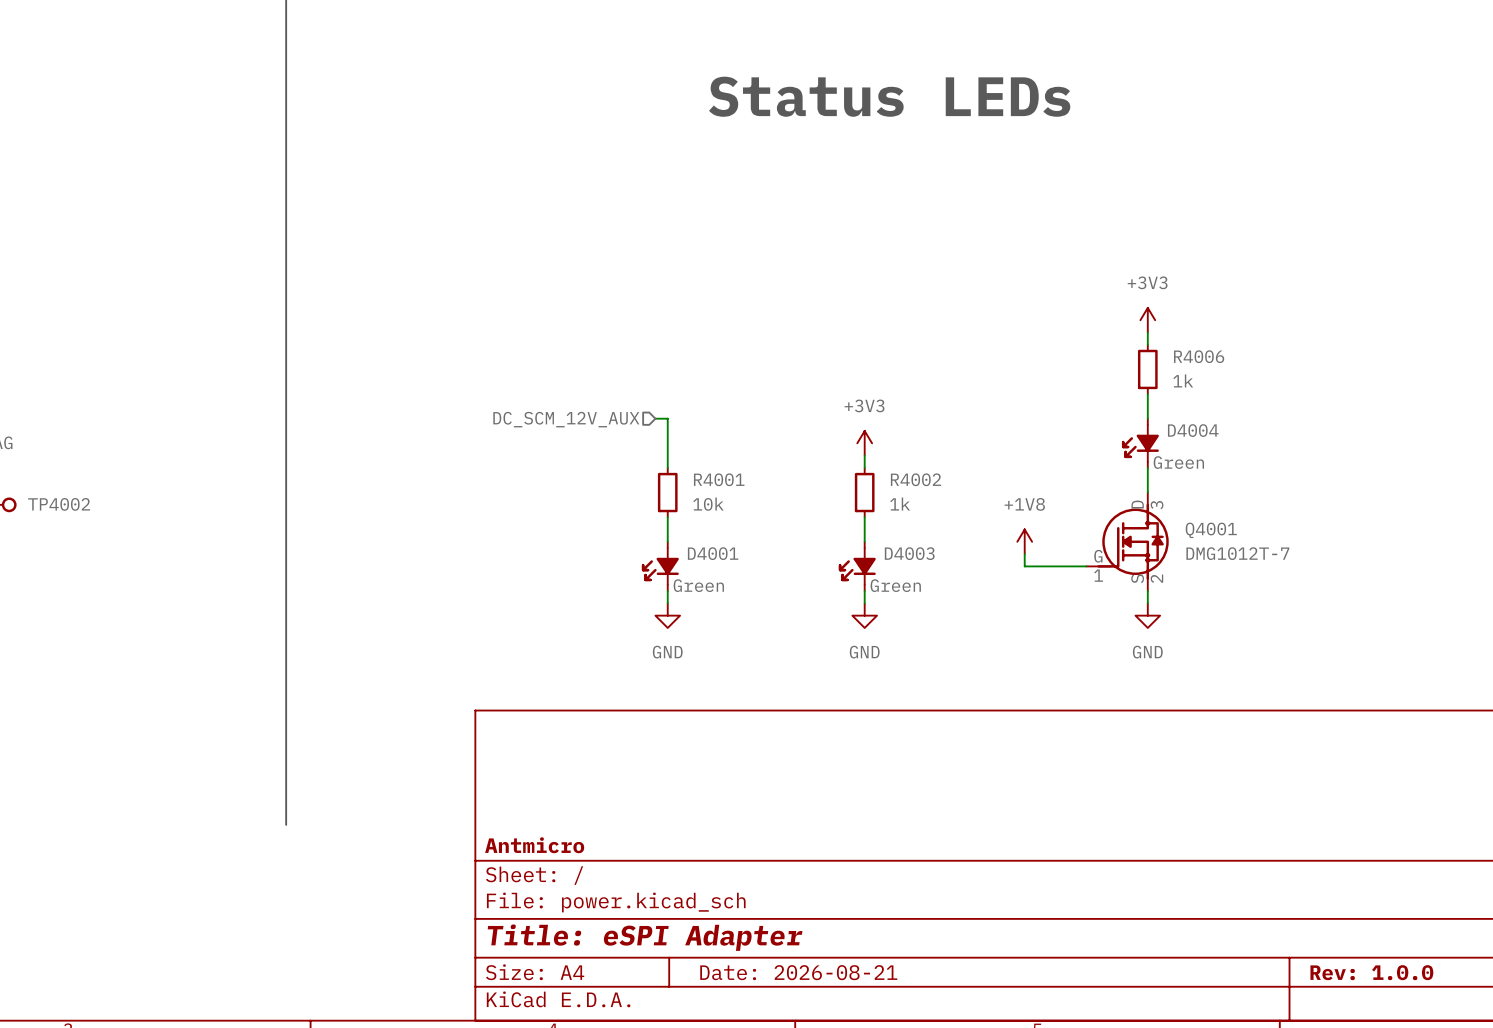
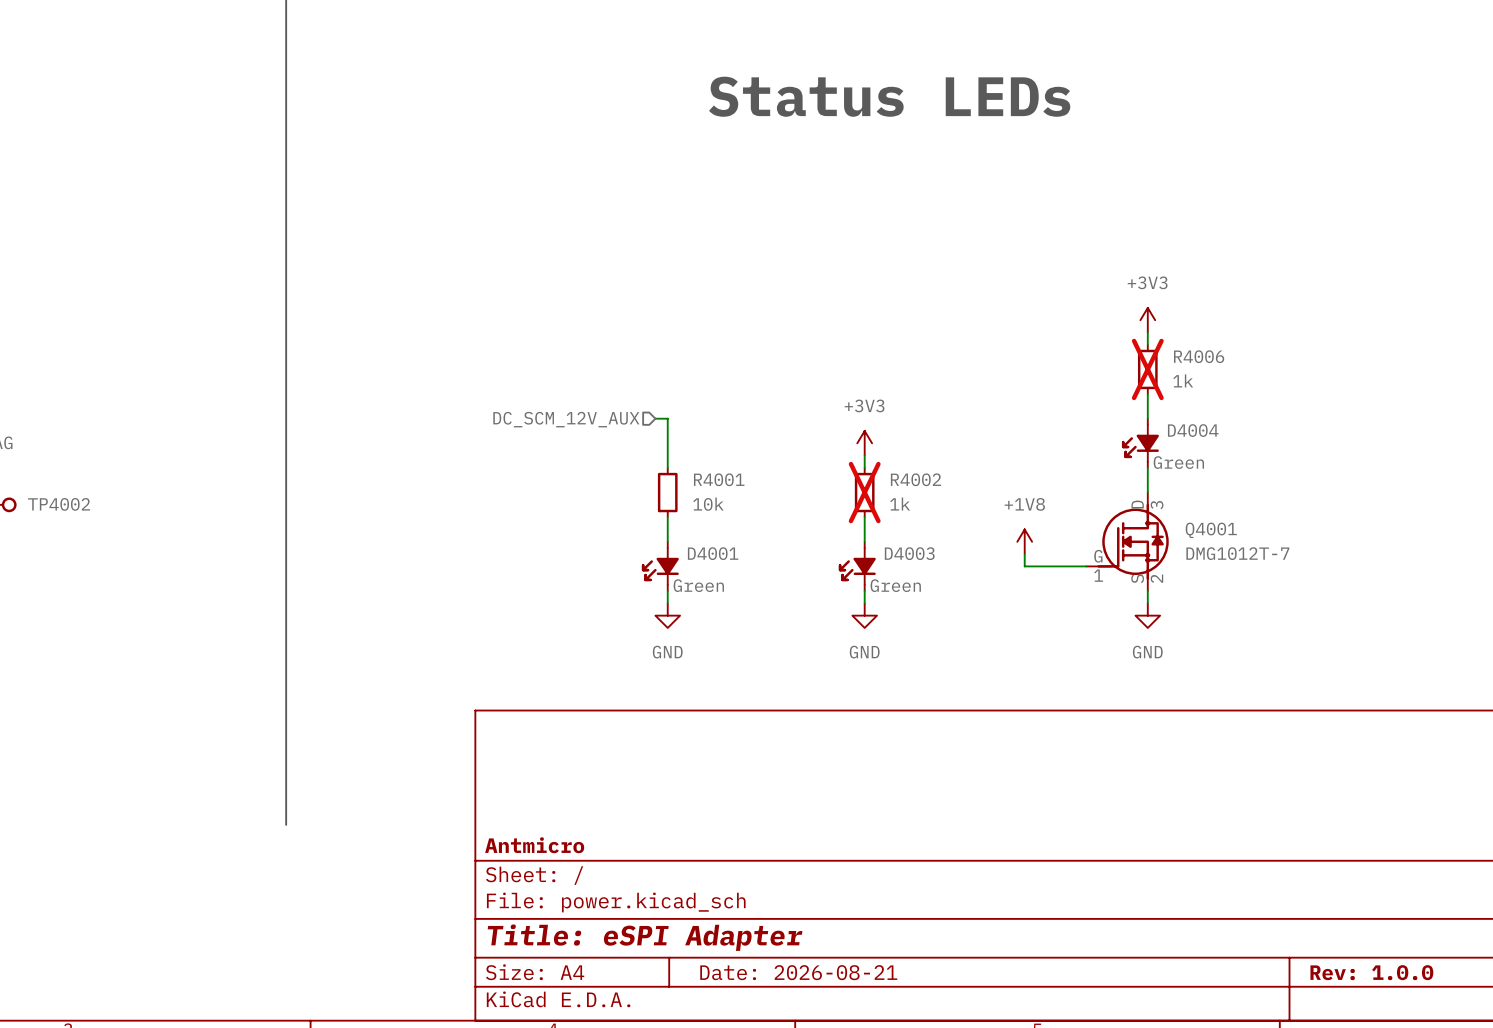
R4006 do-not-place cross: none -> (1147, 369)
R4002 do-not-place cross: none -> (864, 492)

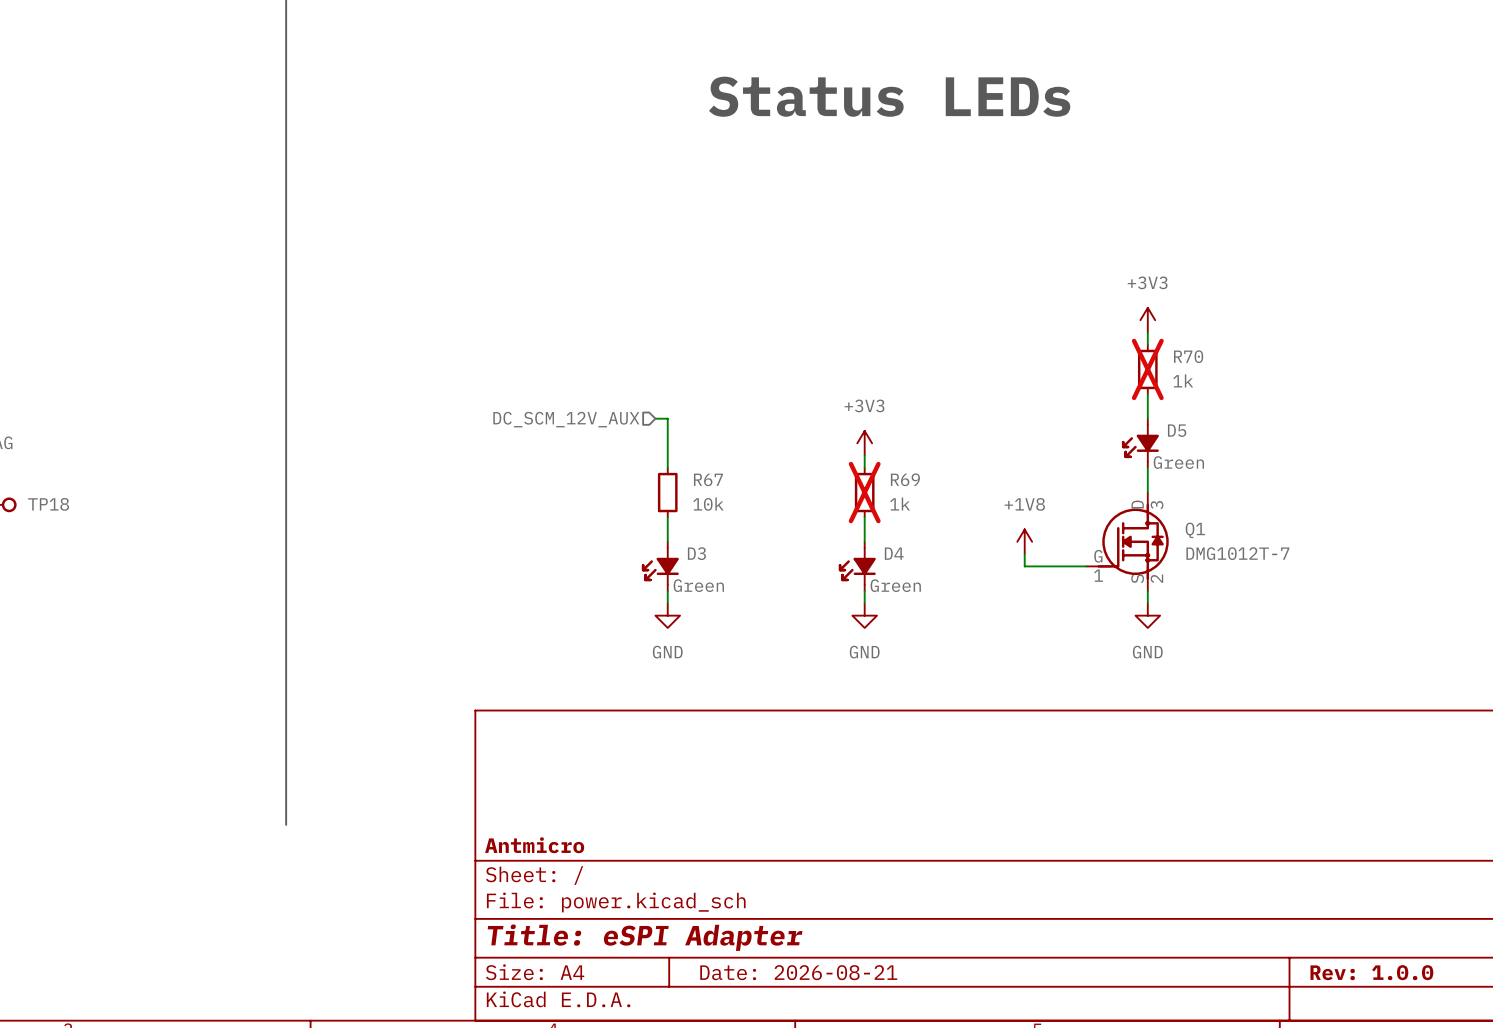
R4006 name: R4006 (1199, 356) -> R70 (1188, 356)
D4004 name: D4004 (1193, 430) -> D5 (1177, 430)
R4001 name: R4001 (719, 479) -> R67 (708, 479)
R4002 name: R4002 (916, 479) -> R69 (905, 479)
TP4002 name: TP4002 (59, 504) -> TP18 (48, 504)
Q4001 name: Q4001 (1211, 530) -> Q1 (1195, 530)
D4001 name: D4001 (713, 553) -> D3 (696, 553)
D4003 name: D4003 (909, 553) -> D4 (894, 553)

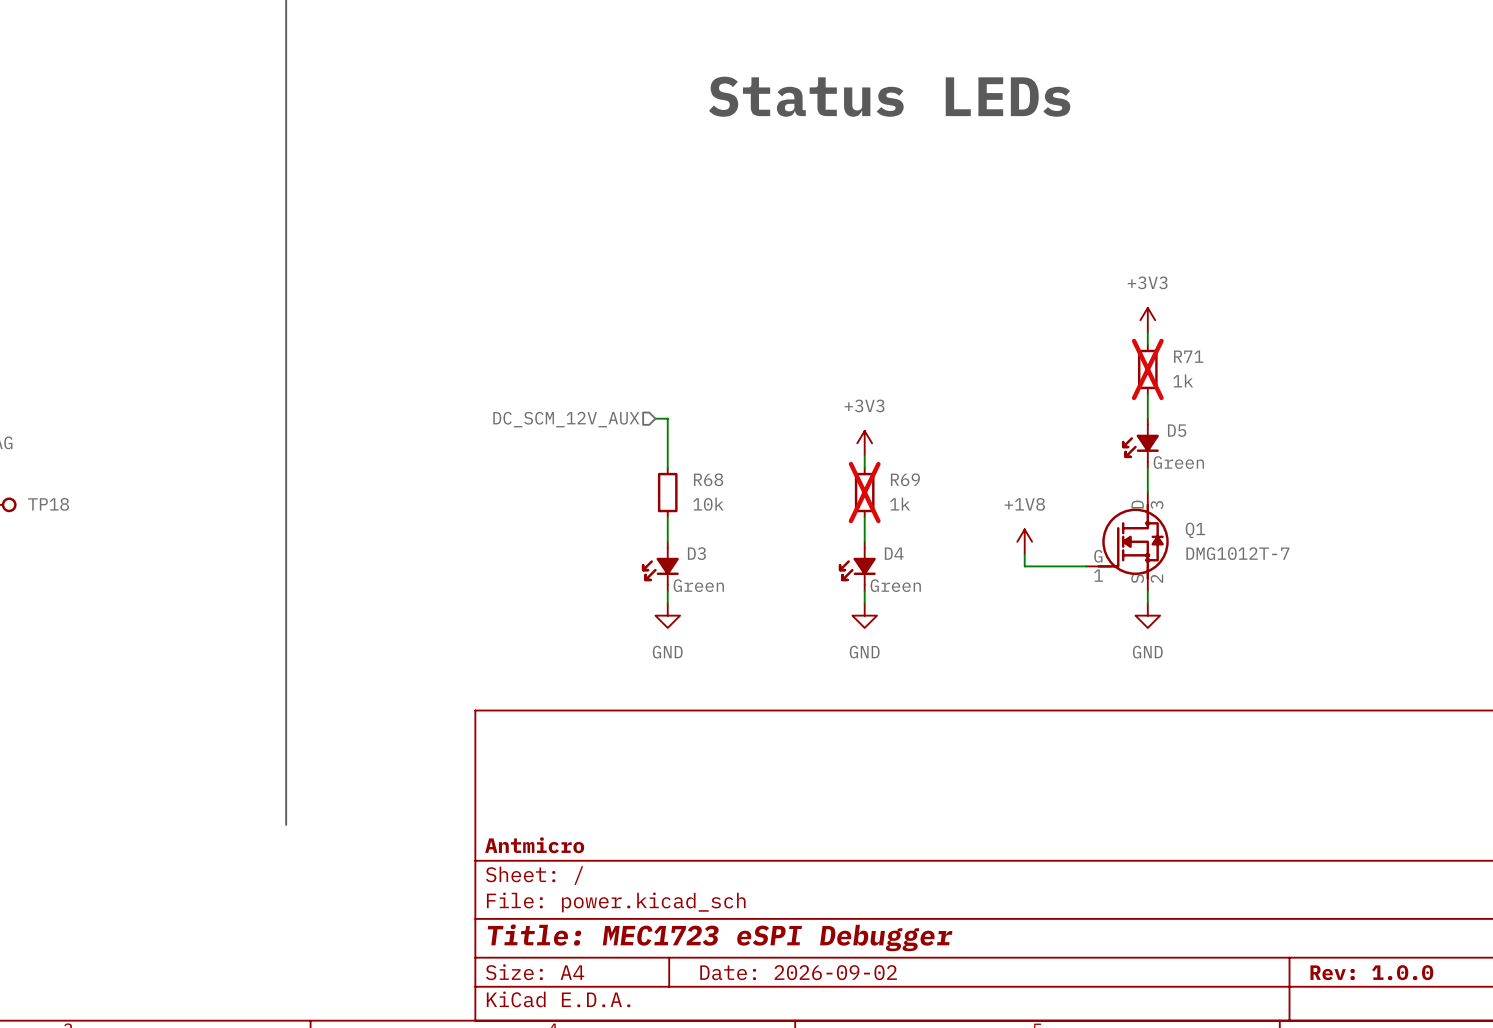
R70 name: R70 (1188, 356) -> R71 (1188, 356)
R67 name: R67 (708, 479) -> R68 (708, 479)
title block: Title: eSPI Adapter (645, 937) -> Title: MEC1723 eSPI Debugger (720, 937)
title block: Date: 2026-08-21 (798, 972) -> Date: 2026-09-02 (798, 972)

